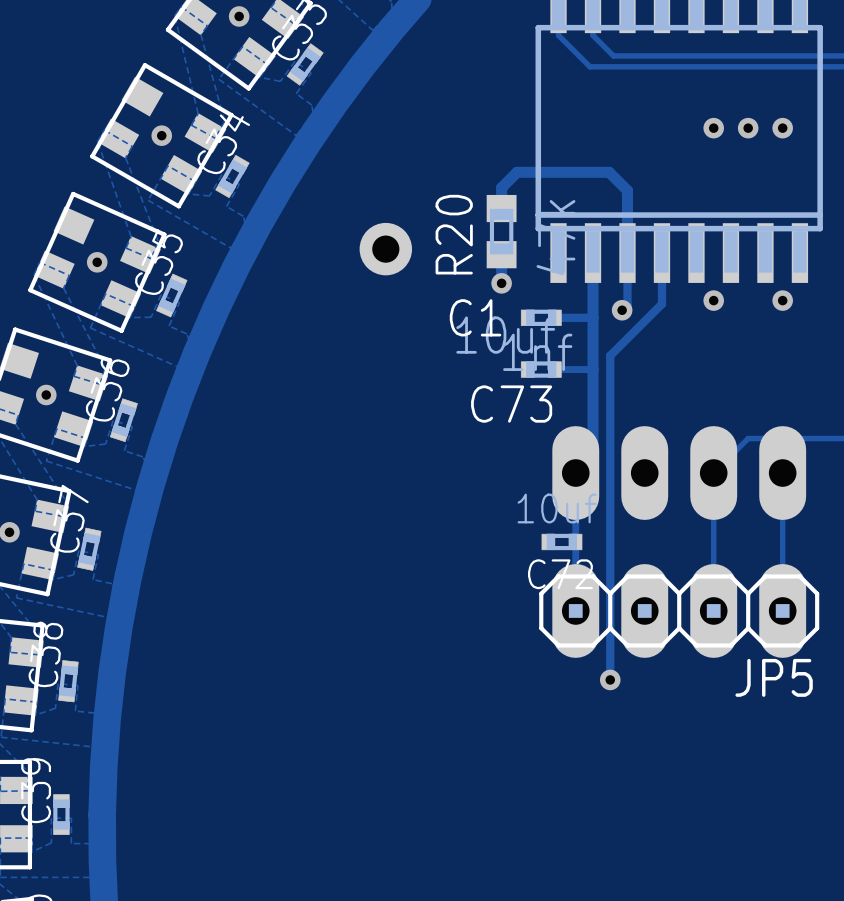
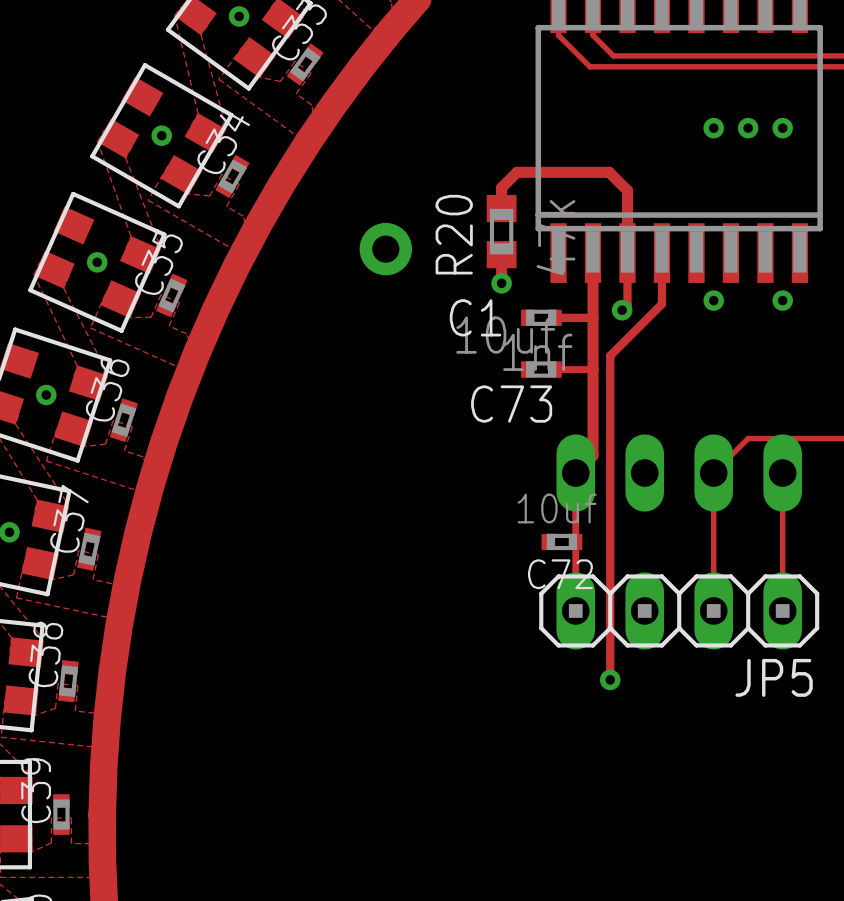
part footprint: [552, 426, 807, 520] -> [556, 434, 802, 512]
JP5 footprint: [539, 564, 820, 658] -> [539, 572, 820, 650]

